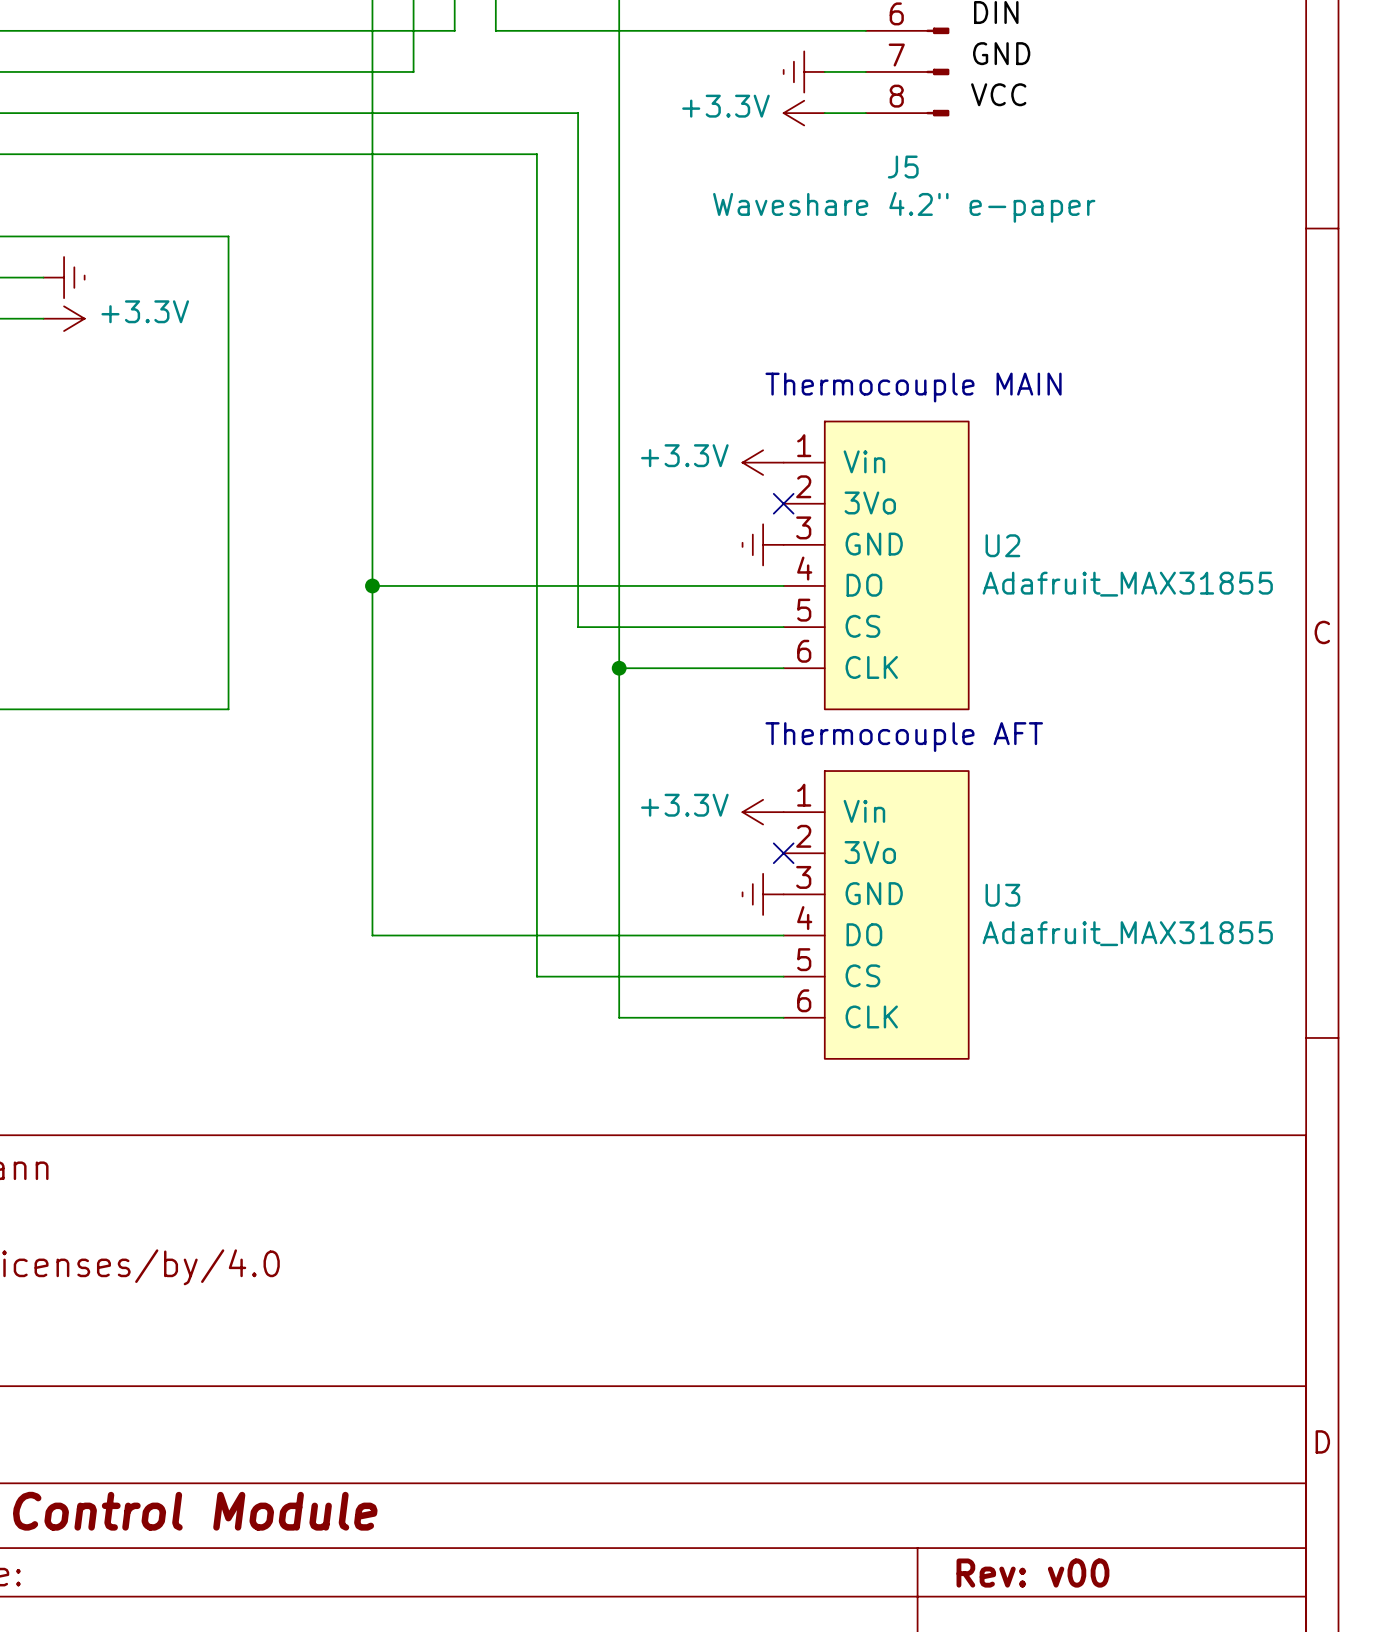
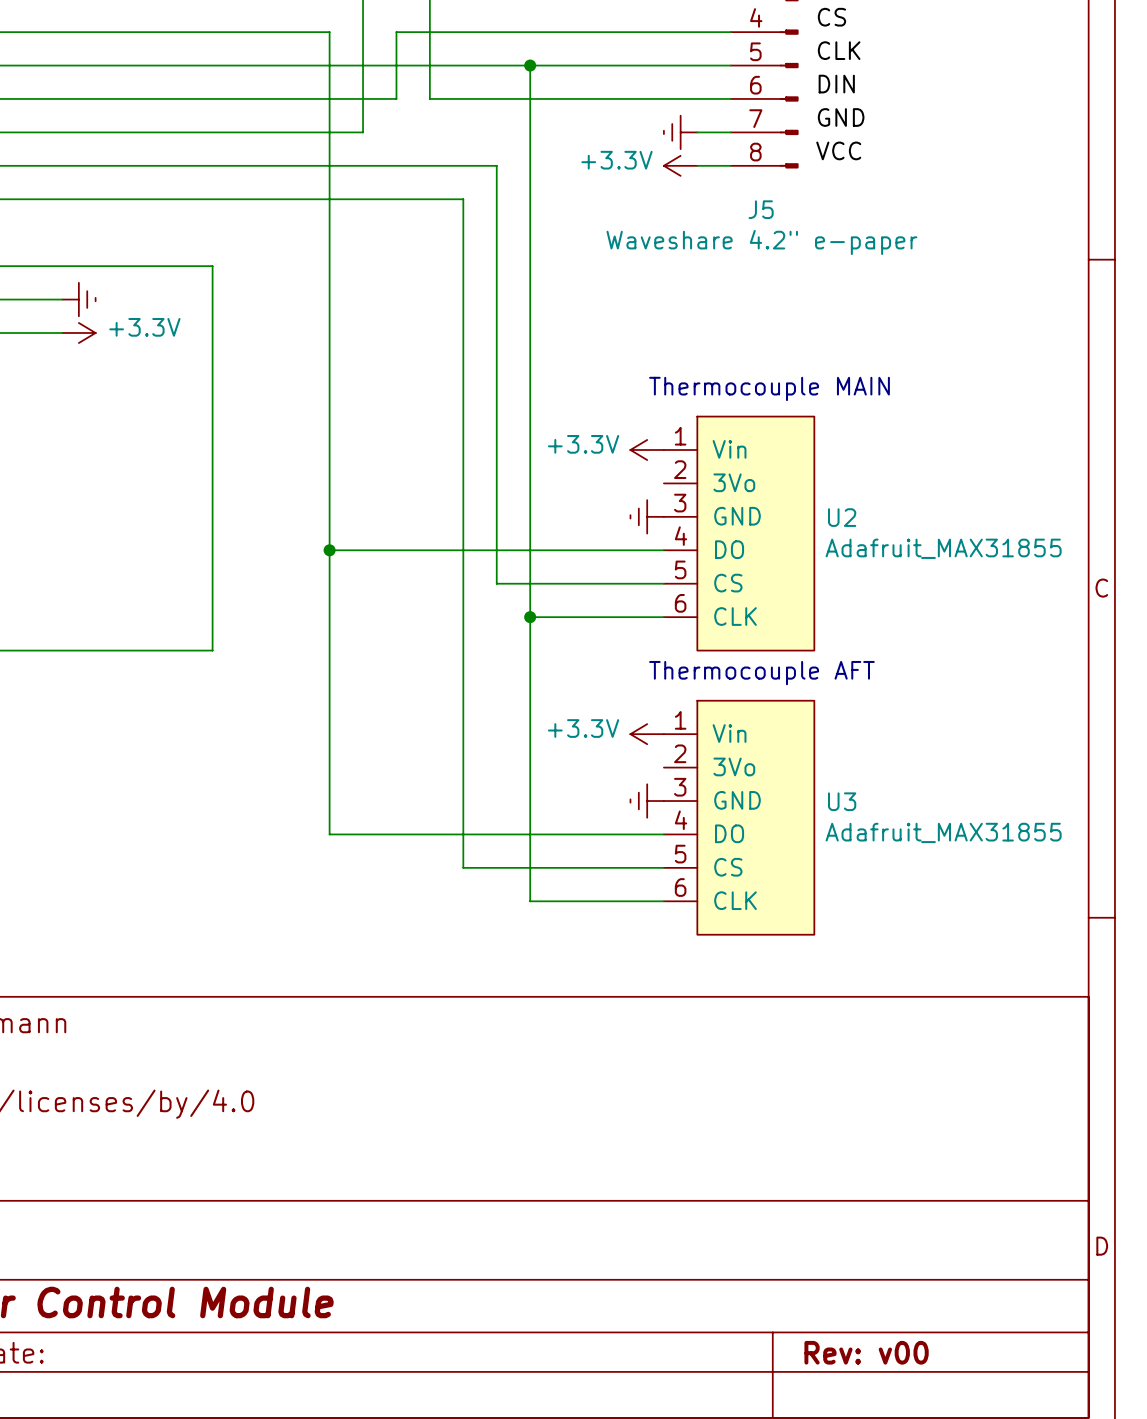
no-connect mark: (783, 503) -> none
no-connect mark: (783, 853) -> none

